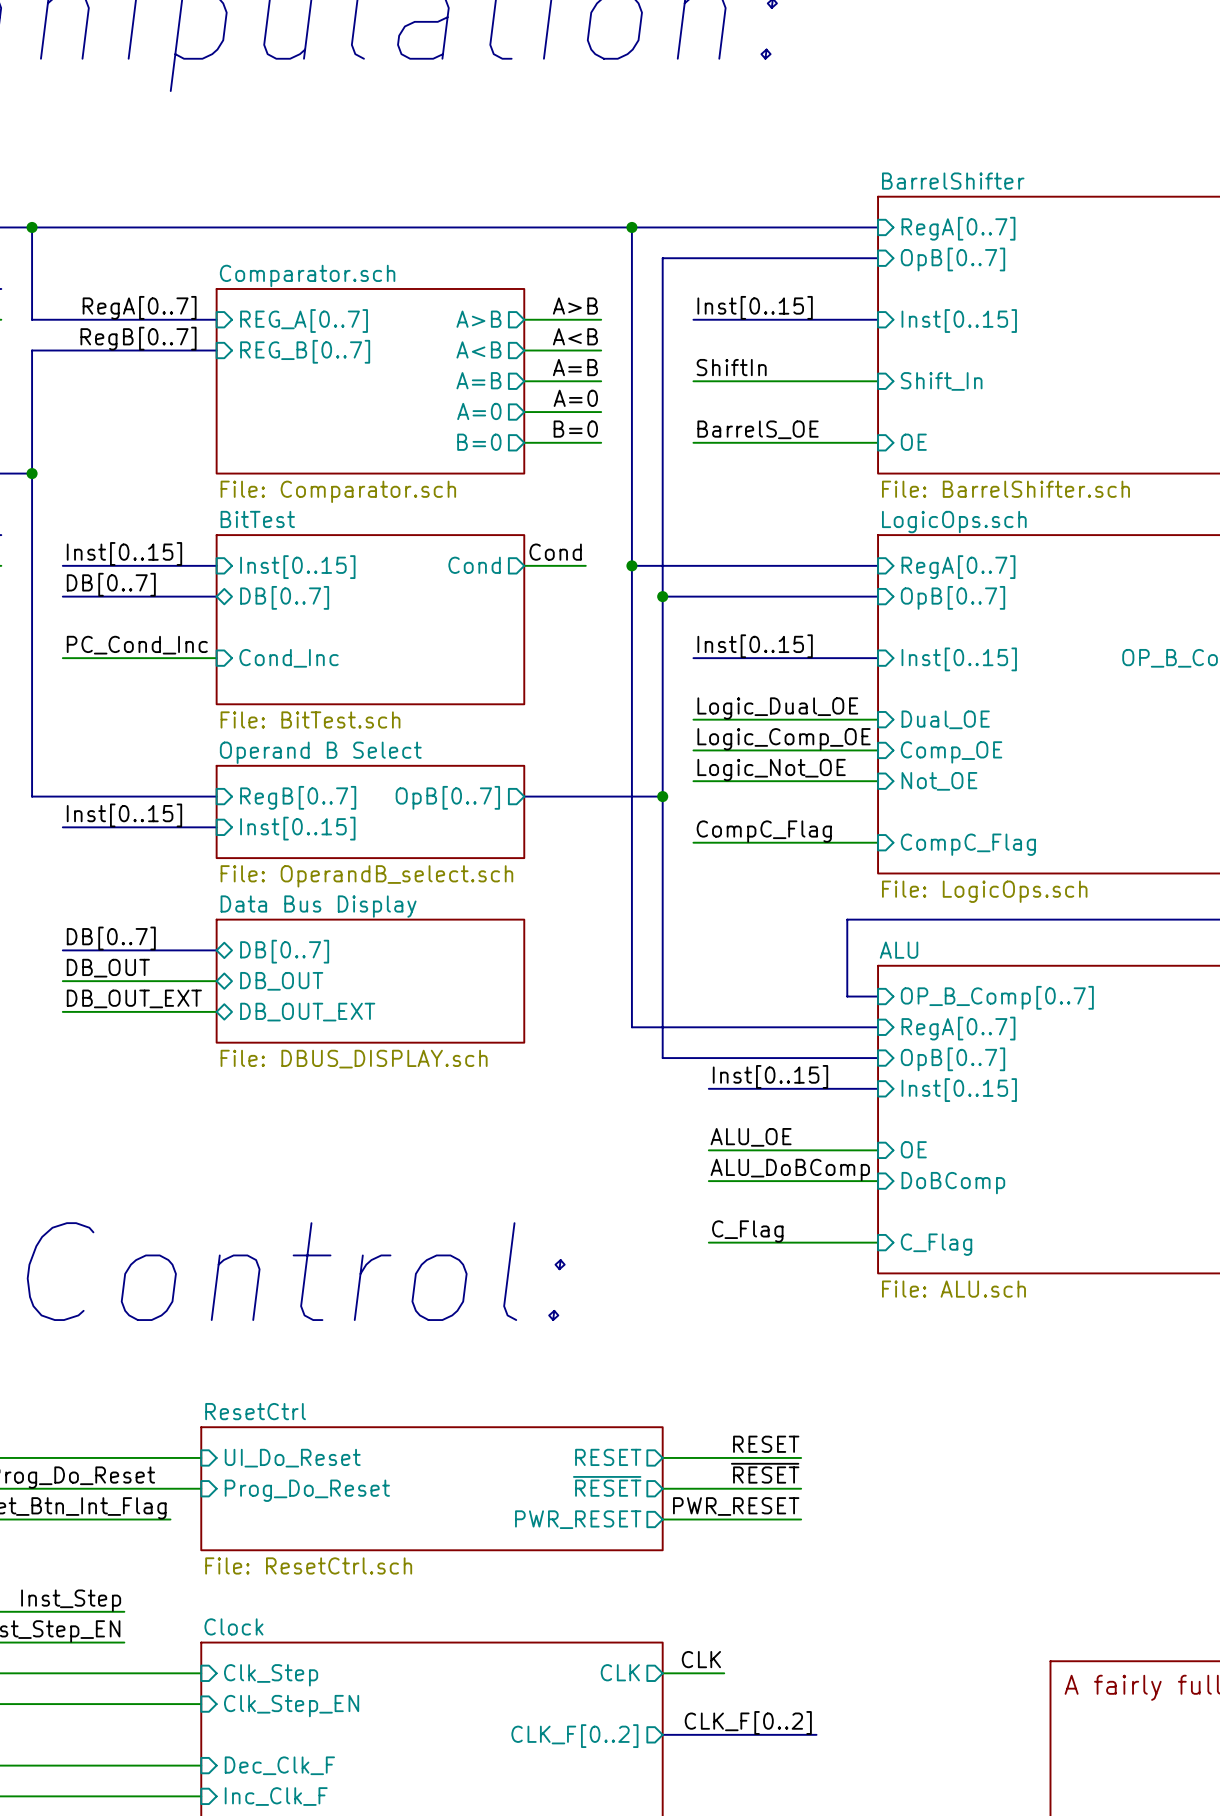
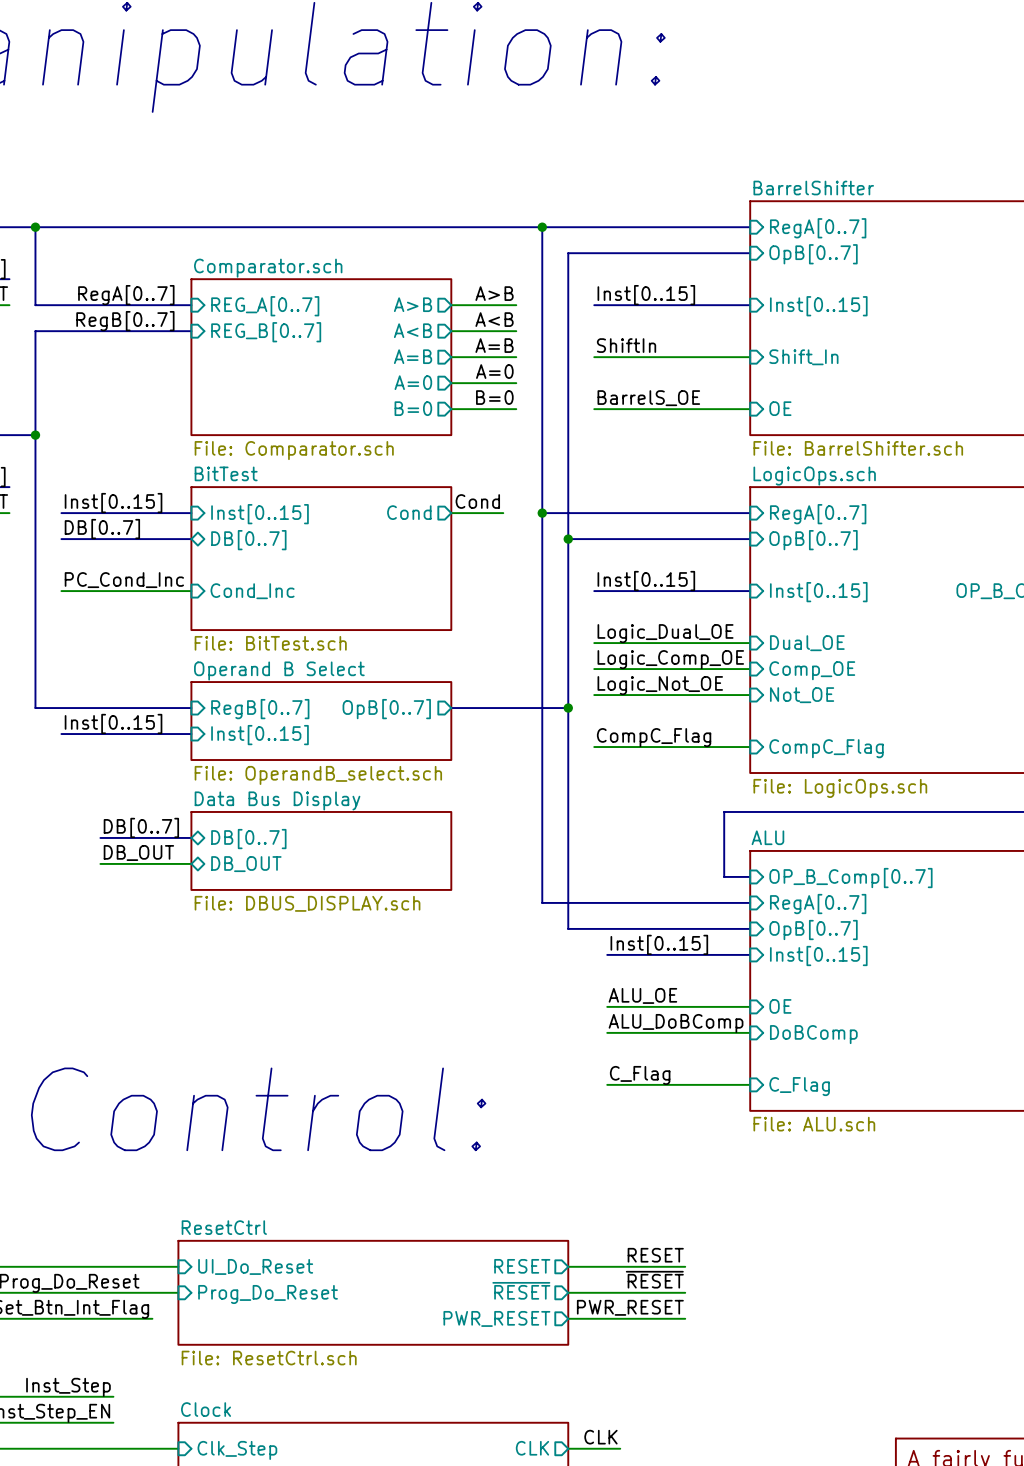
label position: DB[0..7] (111, 938) -> DB[0..7] (141, 827)
bus: (62, 950) (108, 950) -> none
sheet Data Bus Display: none -> File: DBUS_DISPLAY.sch (321, 850)
label position: DB_OUT (108, 968) -> DB_OUT (138, 852)
wire: (62, 981) (108, 981) -> none
sheet Data Bus Display: File: DBUS_DISPLAY.sch (370, 981) -> none
label: DB_OUT_EXT (134, 998) -> none
wire: (62, 1011) (216, 1011) -> none
sheet pin: DB_OUT_EXT (307, 1012) -> none

